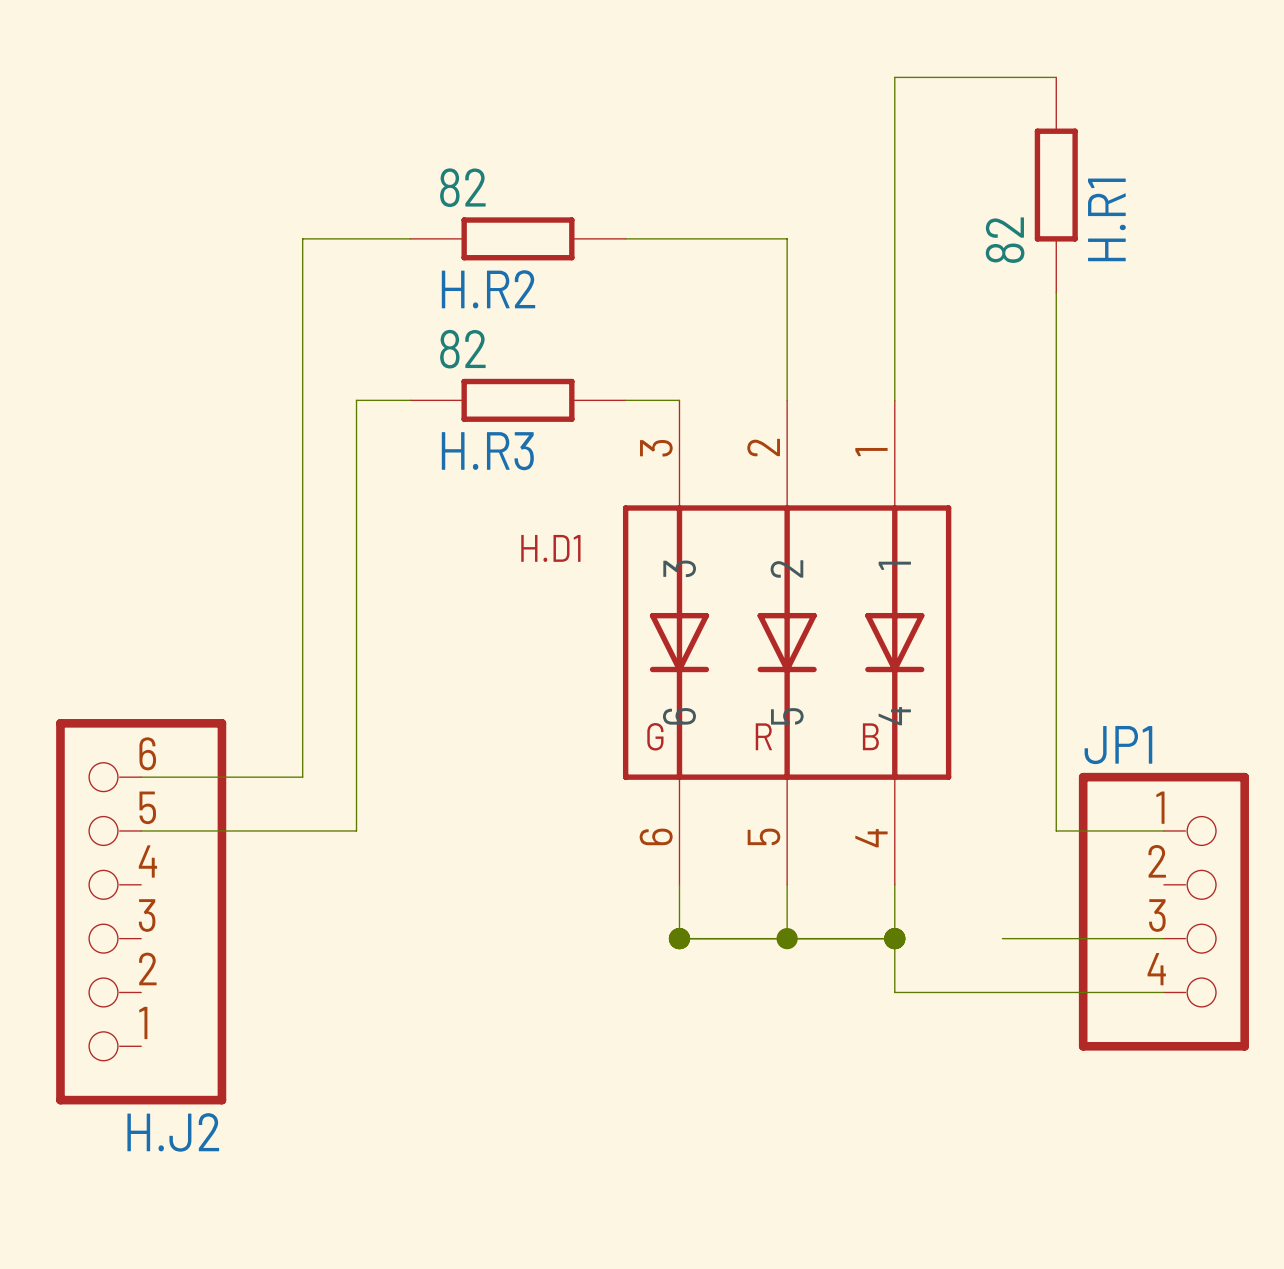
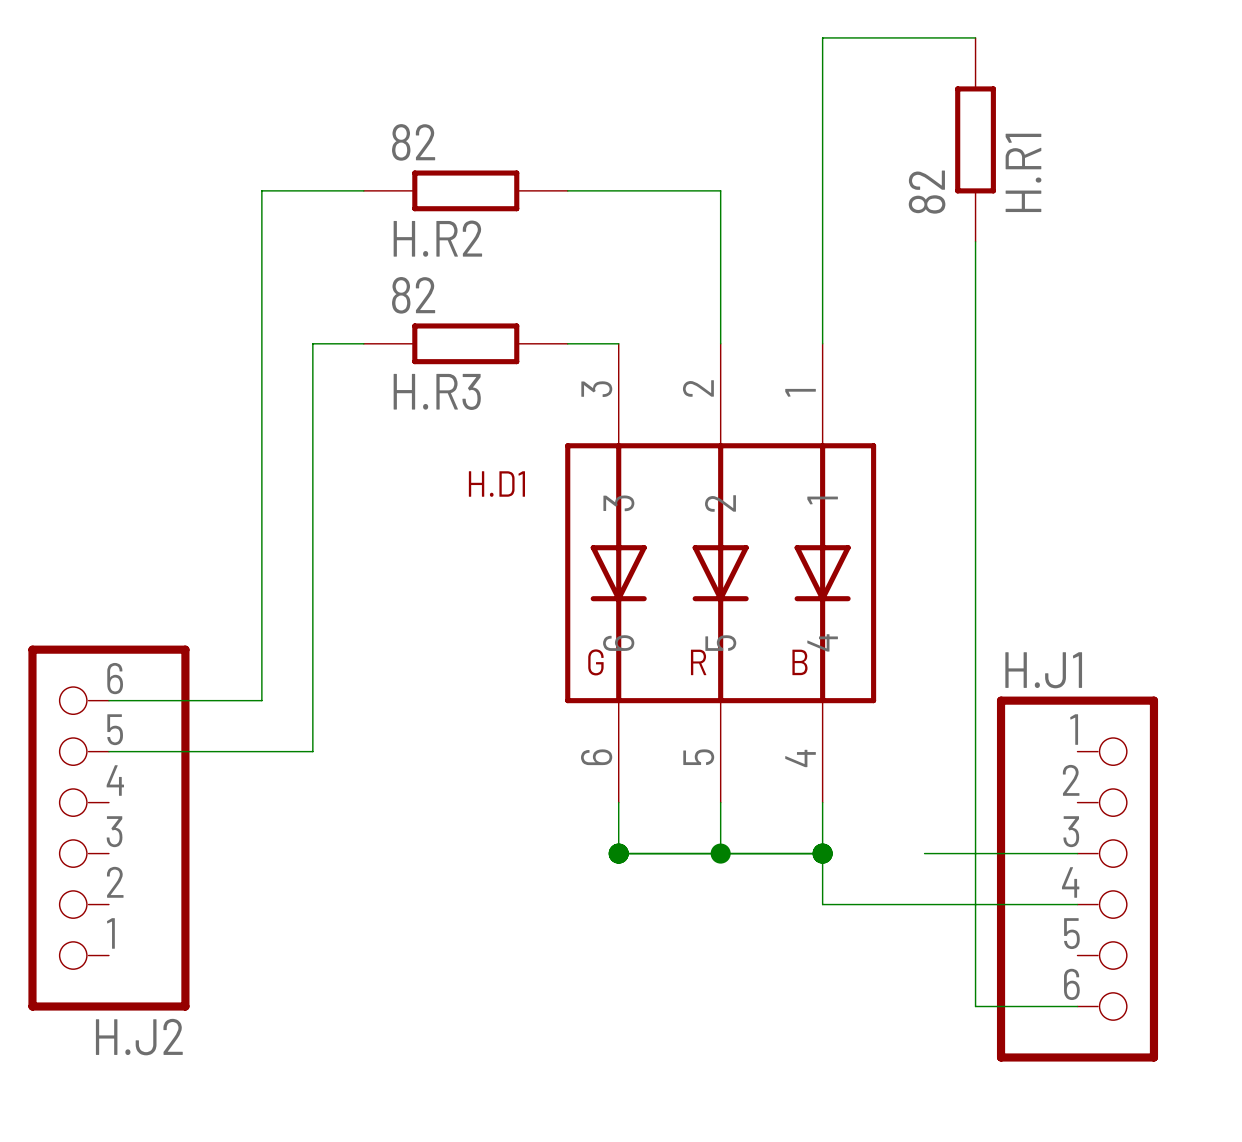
wire: (1056, 830) (1163, 830) -> (975, 751) (975, 1006) (1077, 1006)
JP1: (1163, 911) -> none
H.J1: none -> (1077, 879)

